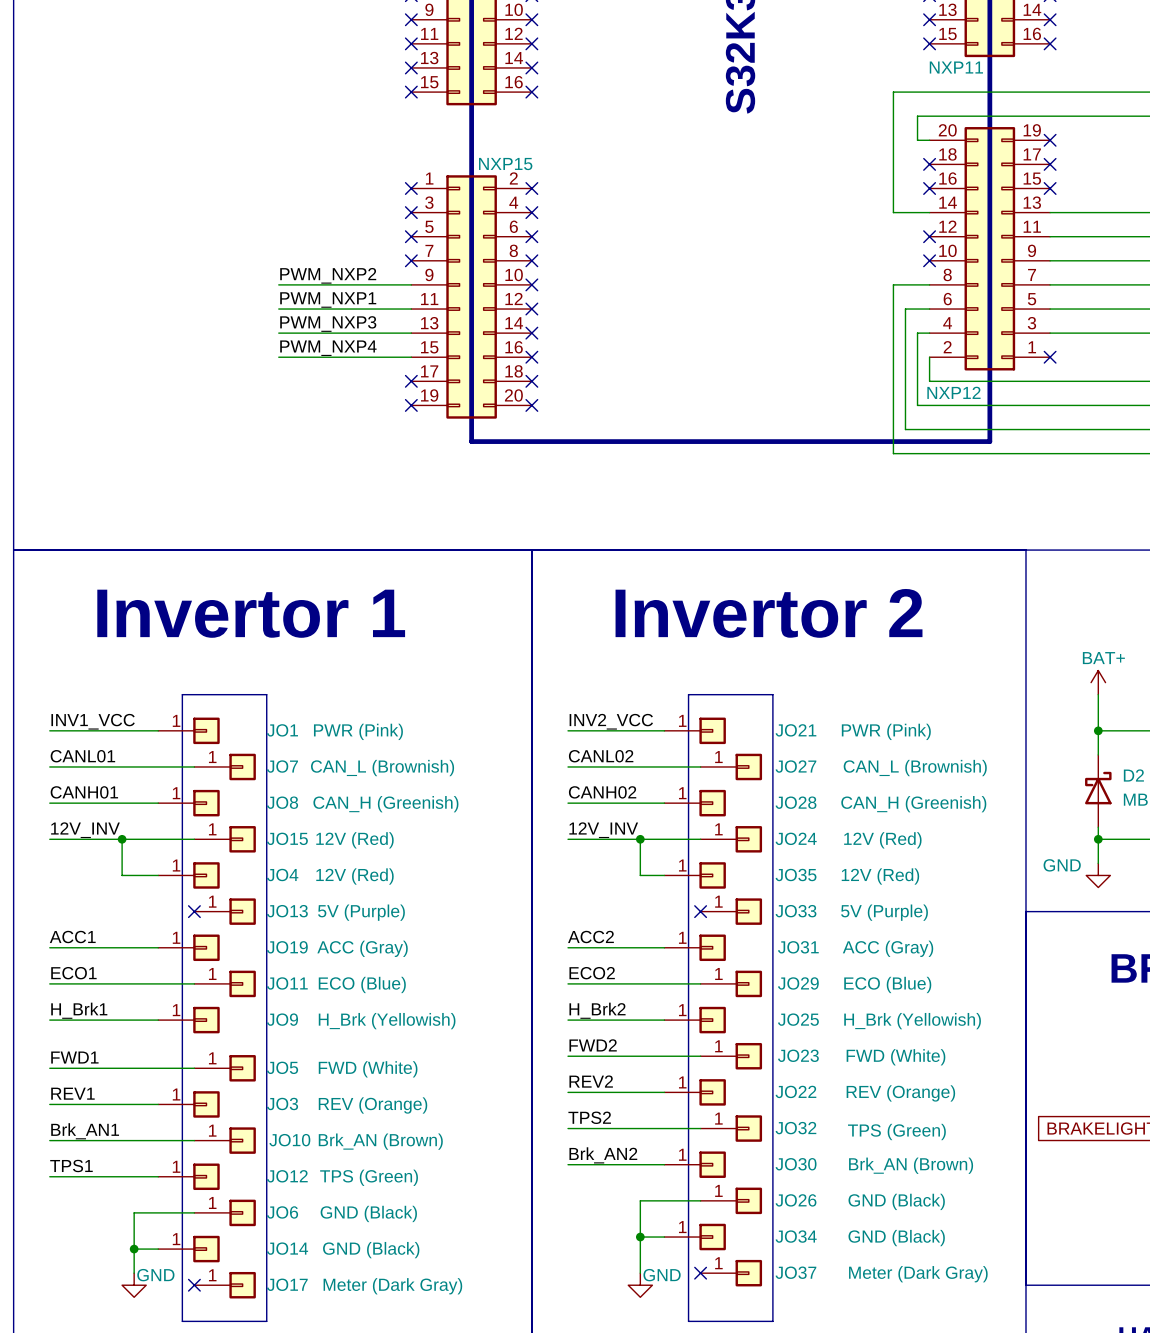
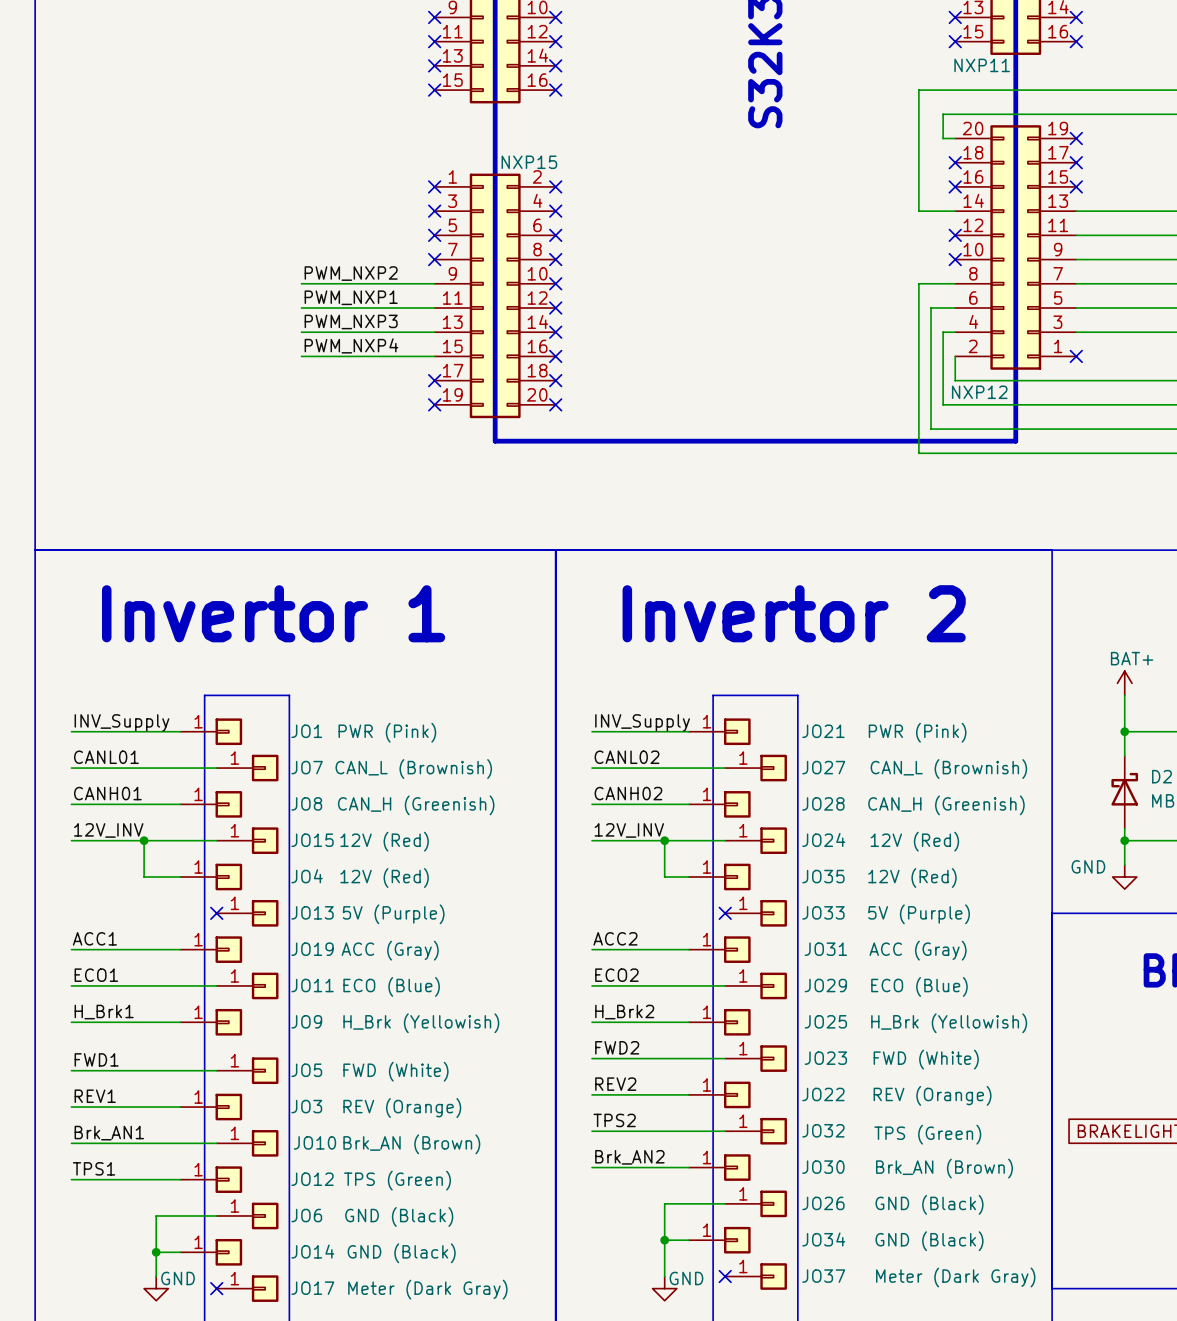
label: INV1_VCC (93, 721) -> INV_Supply (122, 722)
label: INV2_VCC (611, 721) -> INV_Supply (642, 722)

